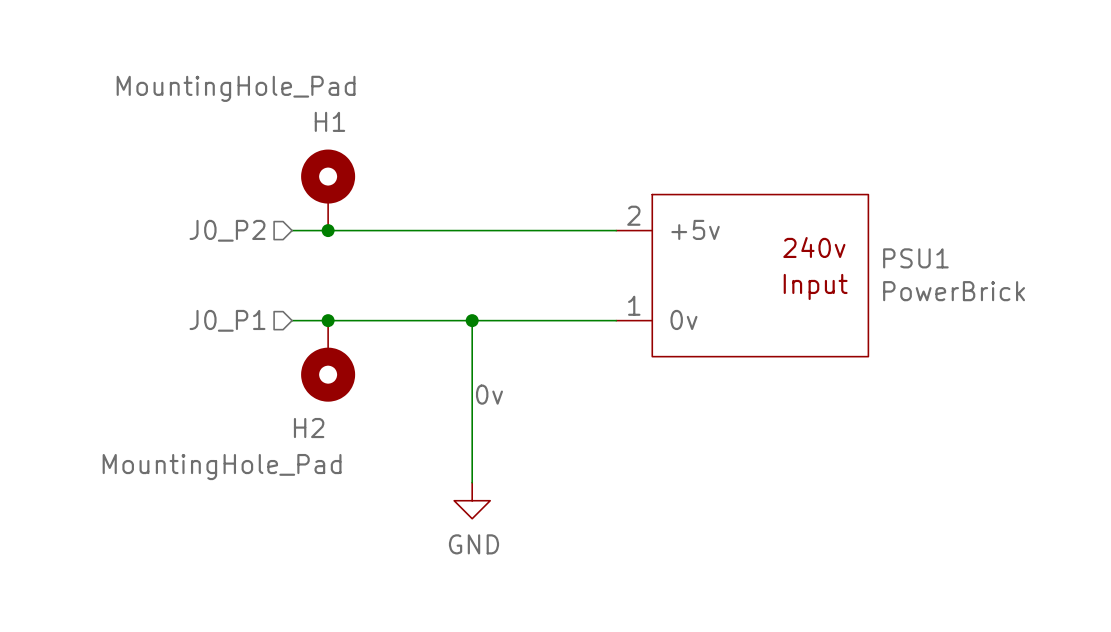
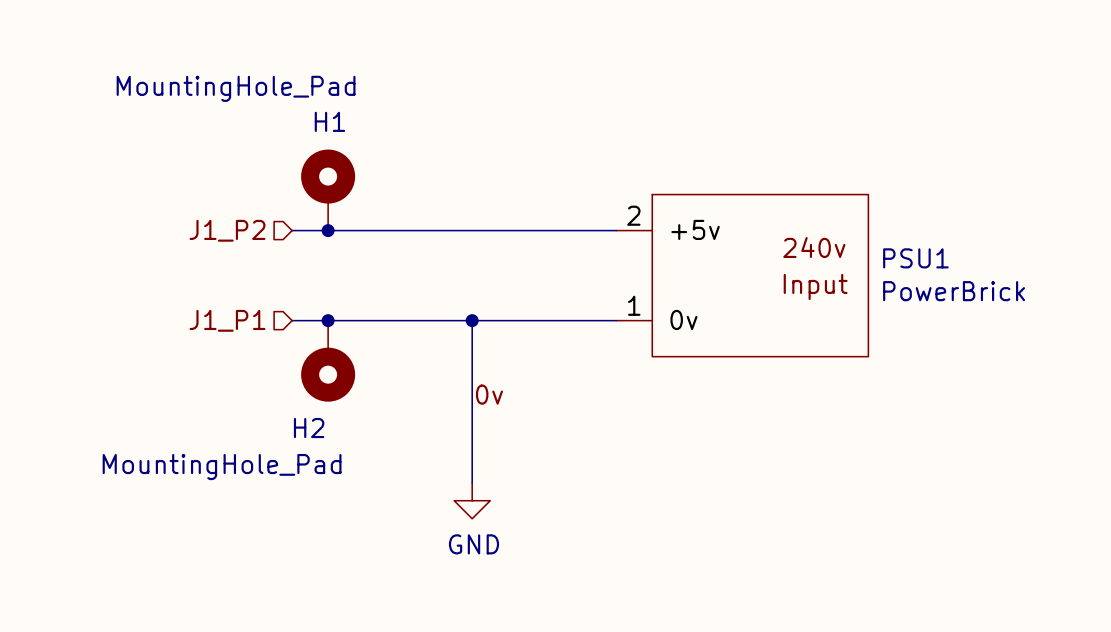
hierarchical label: J0_P2 (227, 230) -> J1_P2 (227, 230)
hierarchical label: J0_P1 (227, 320) -> J1_P1 (227, 320)

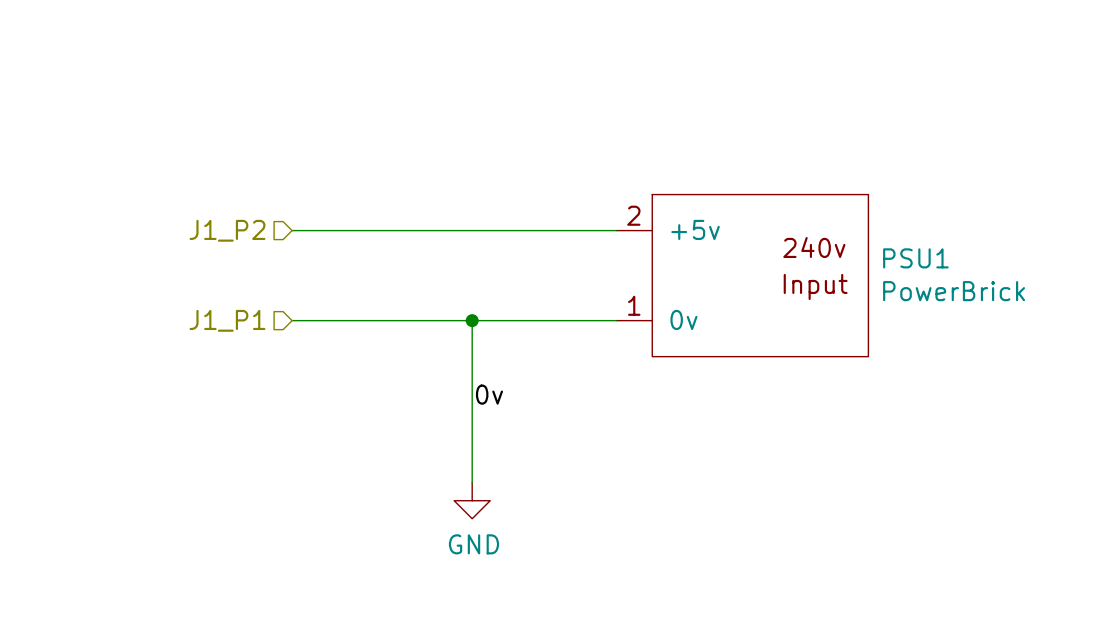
H1: MountingHole_Pad (328, 190) -> none
junction: (328, 230) -> none
junction: (328, 320) -> none
H2: MountingHole_Pad (328, 361) -> none

